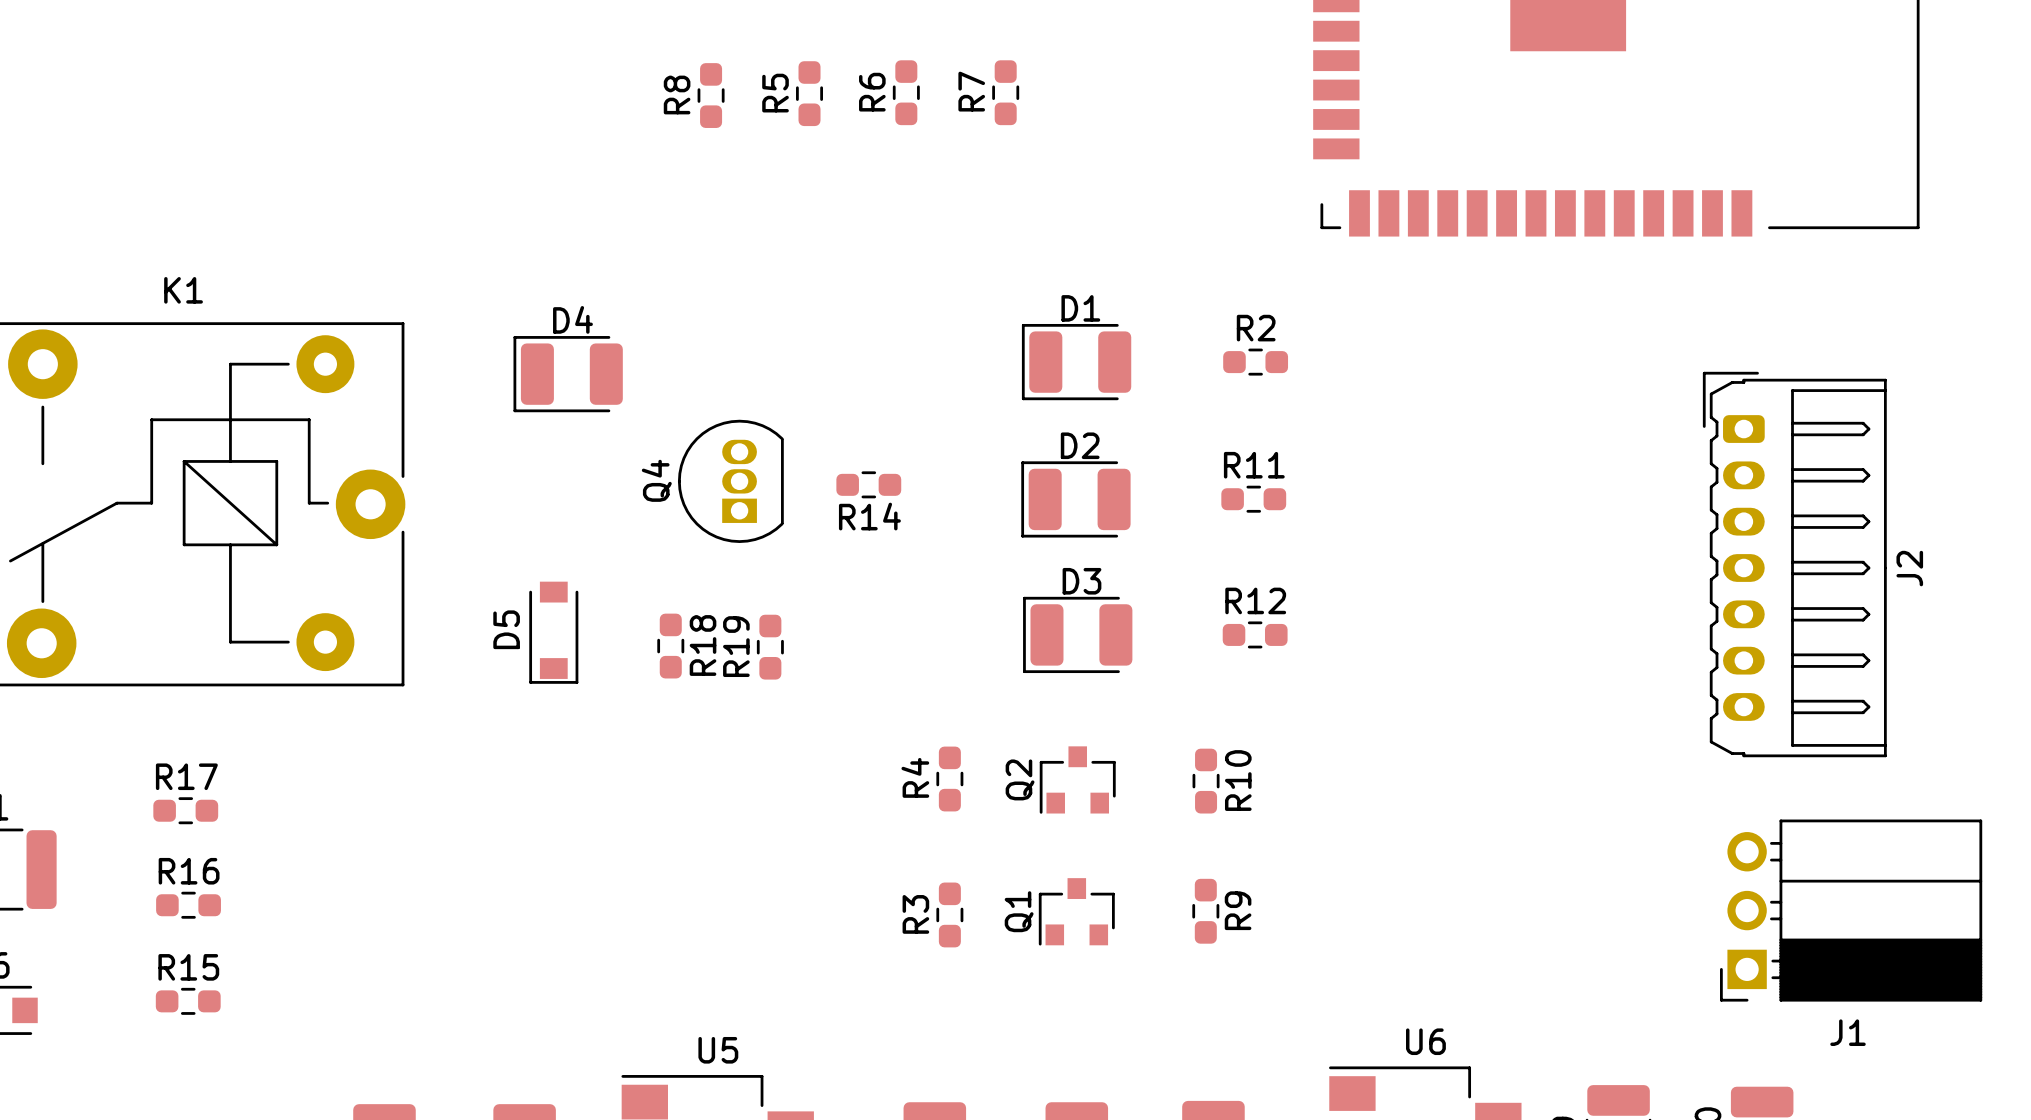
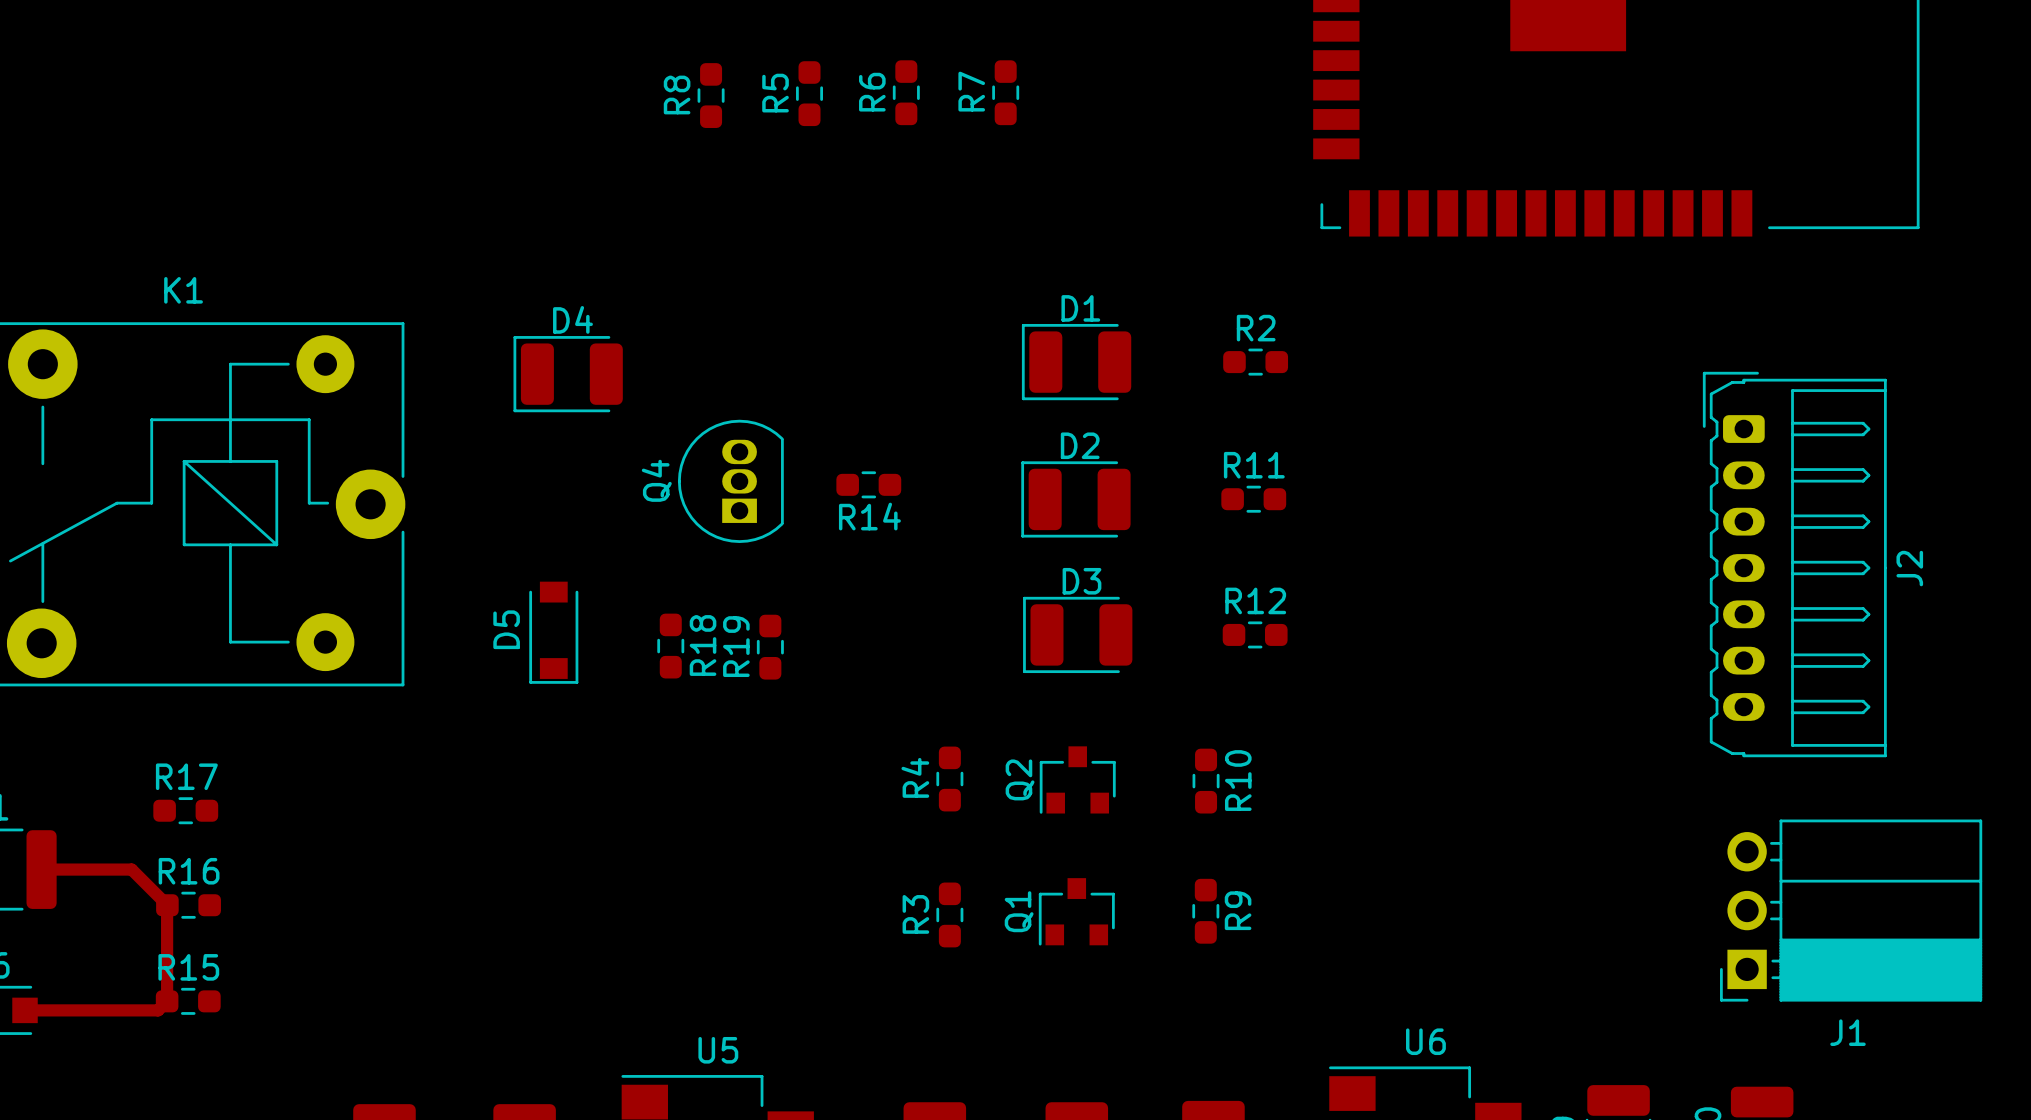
track: none -> (41, 869) (131, 869) (167, 905)
track: none -> (167, 905) (167, 1001) (158, 1010) (25, 1010)

